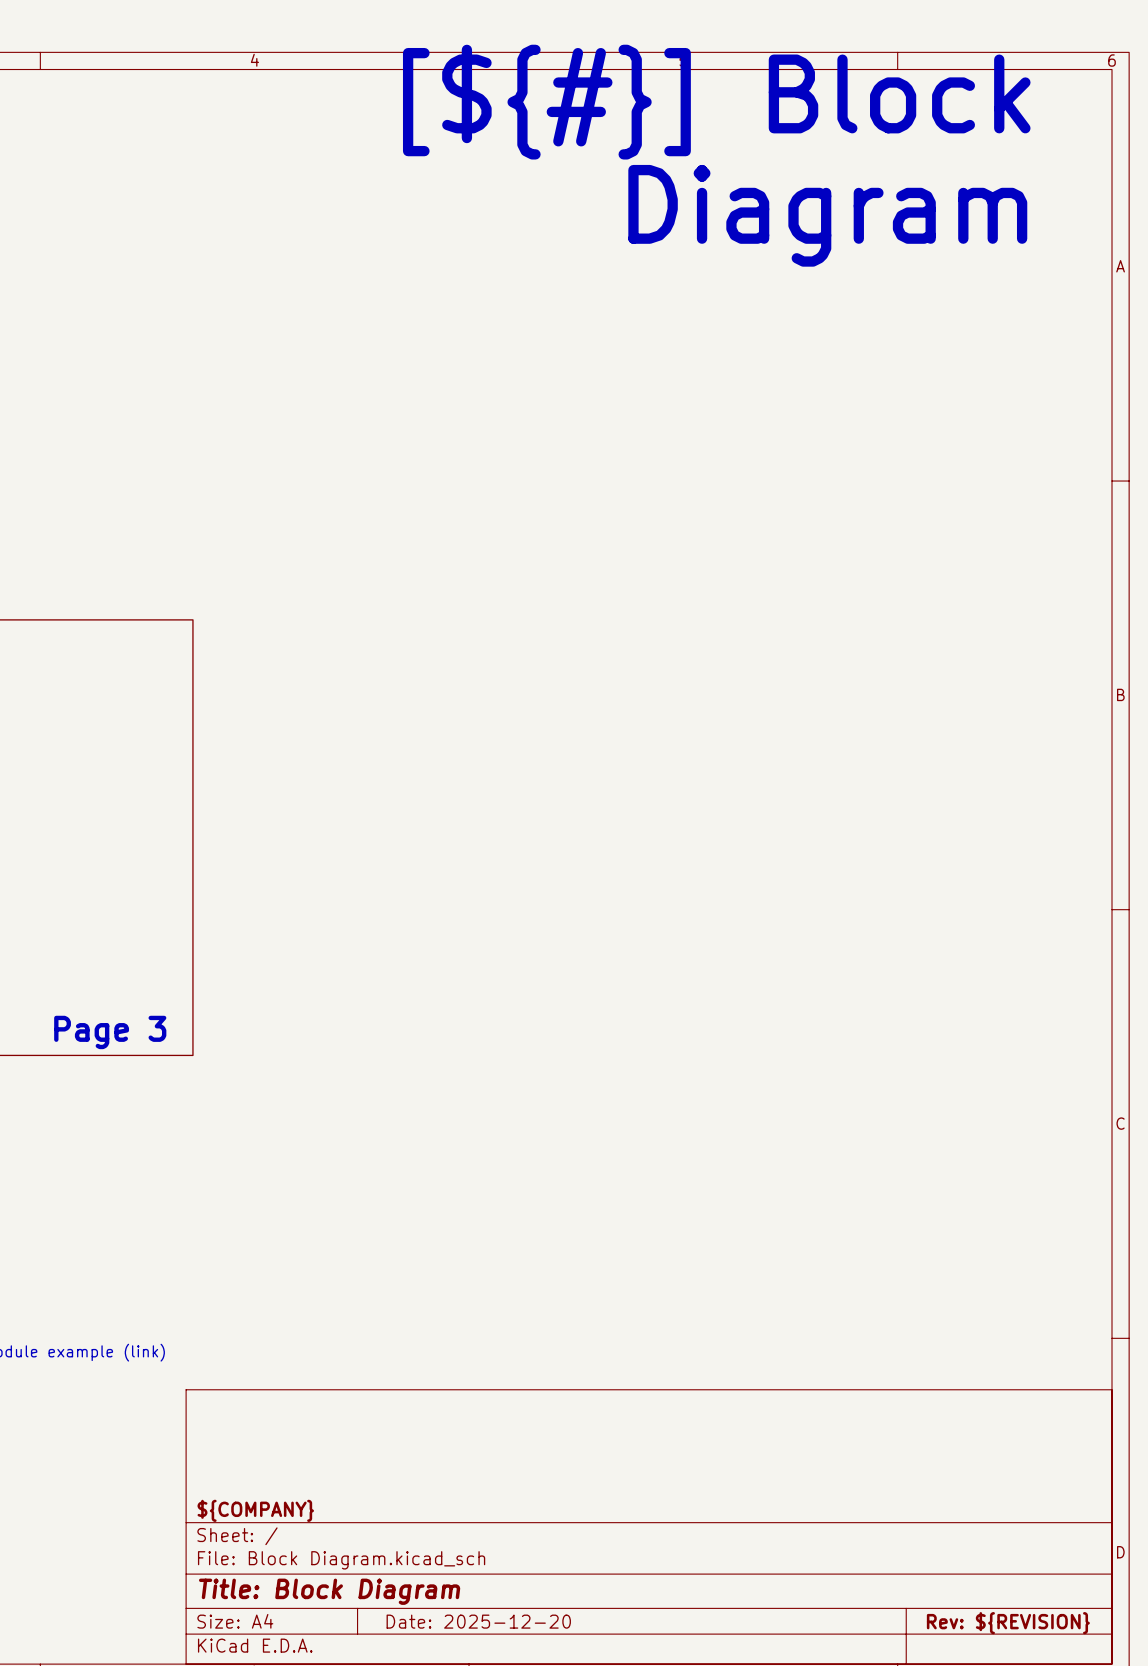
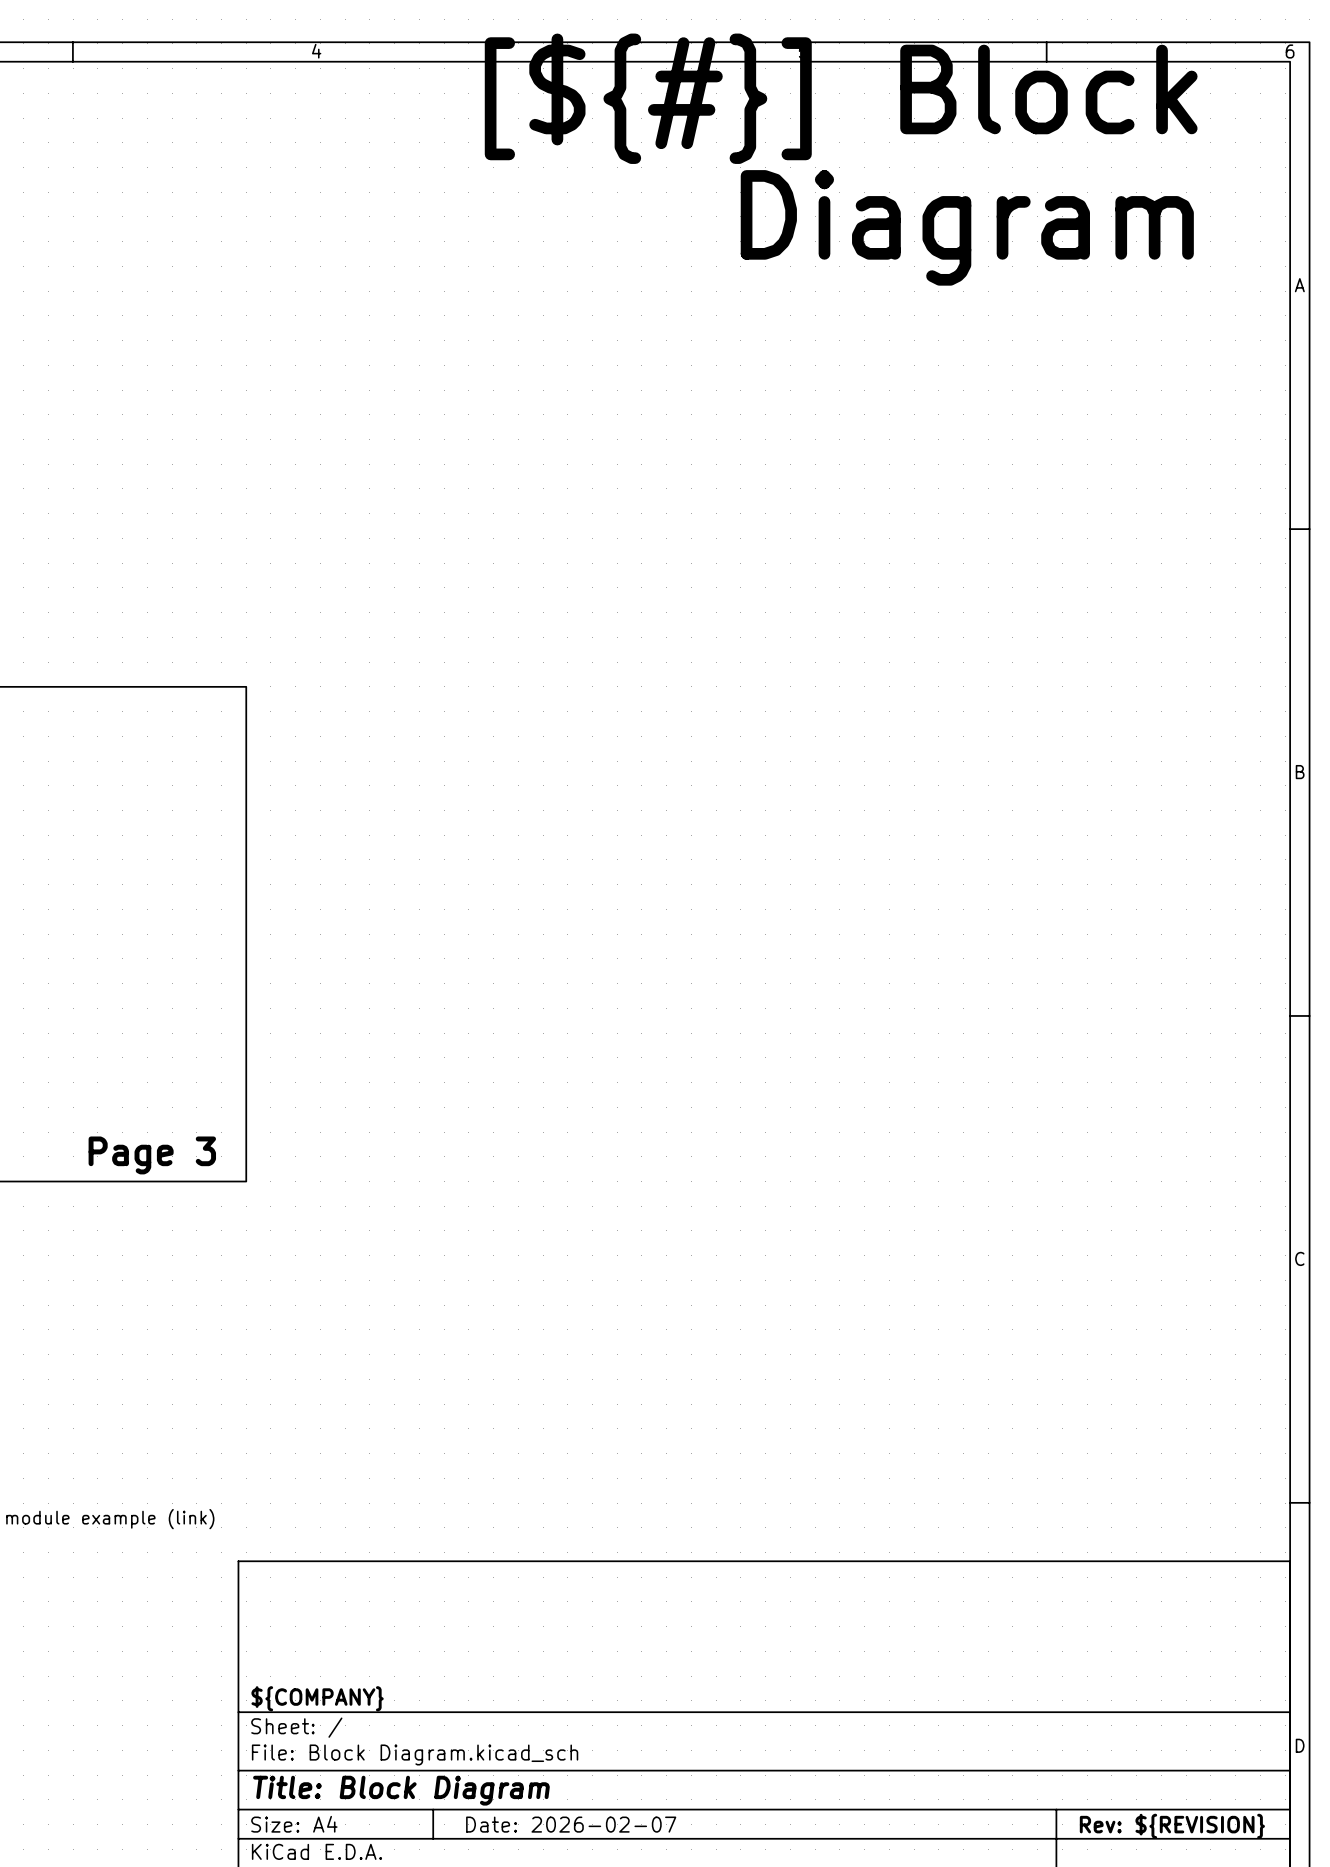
title block: Date: 2025-12-20 (478, 1621) -> Date: 2026-02-07 (571, 1824)

